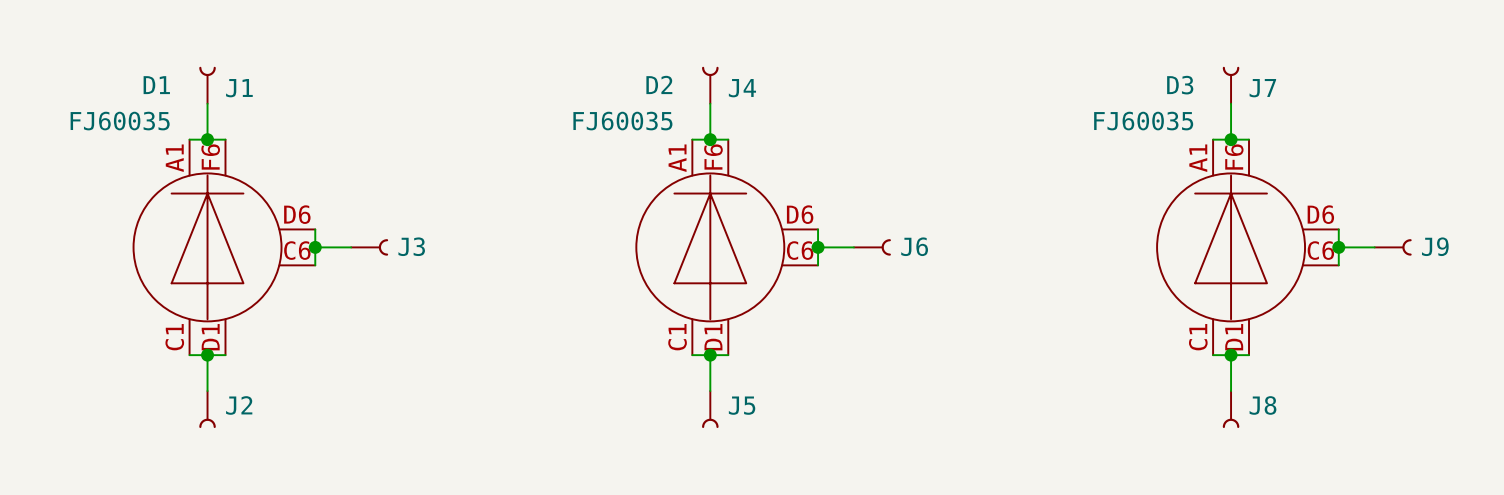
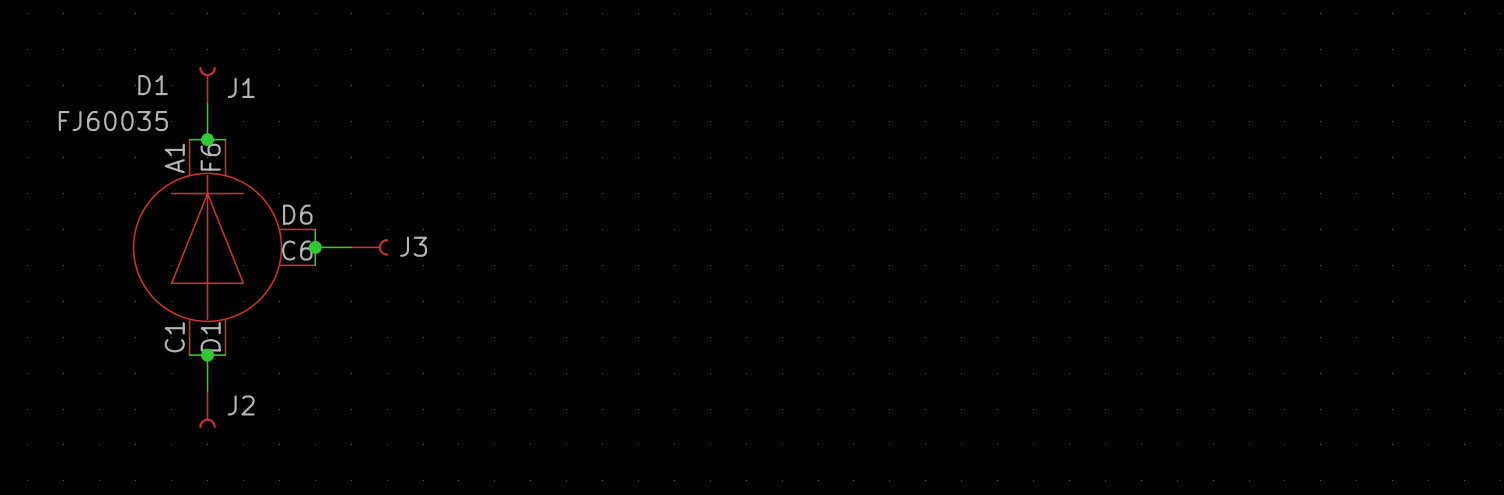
J4: (710, 85) -> none
J7: (1231, 85) -> none
wire: (710, 103) (710, 139) -> none
wire: (1231, 103) (1231, 139) -> none
wire: (692, 139) (728, 139) -> none
junction: (710, 139) -> none
wire: (1213, 139) (1249, 139) -> none
junction: (1231, 139) -> none
wire: (818, 229) (818, 265) -> none
wire: (1338, 229) (1338, 265) -> none
D2: FJ60035 (727, 247) -> none
wire: (818, 247) (853, 247) -> none
junction: (818, 247) -> none
J6: (872, 247) -> none
D3: FJ60035 (1247, 247) -> none
wire: (1338, 247) (1374, 247) -> none
junction: (1338, 247) -> none
J9: (1393, 247) -> none
wire: (692, 355) (728, 355) -> none
wire: (710, 355) (710, 391) -> none
junction: (710, 355) -> none
wire: (1213, 355) (1249, 355) -> none
wire: (1231, 355) (1231, 391) -> none
junction: (1231, 355) -> none
J5: (710, 409) -> none
J8: (1231, 409) -> none

